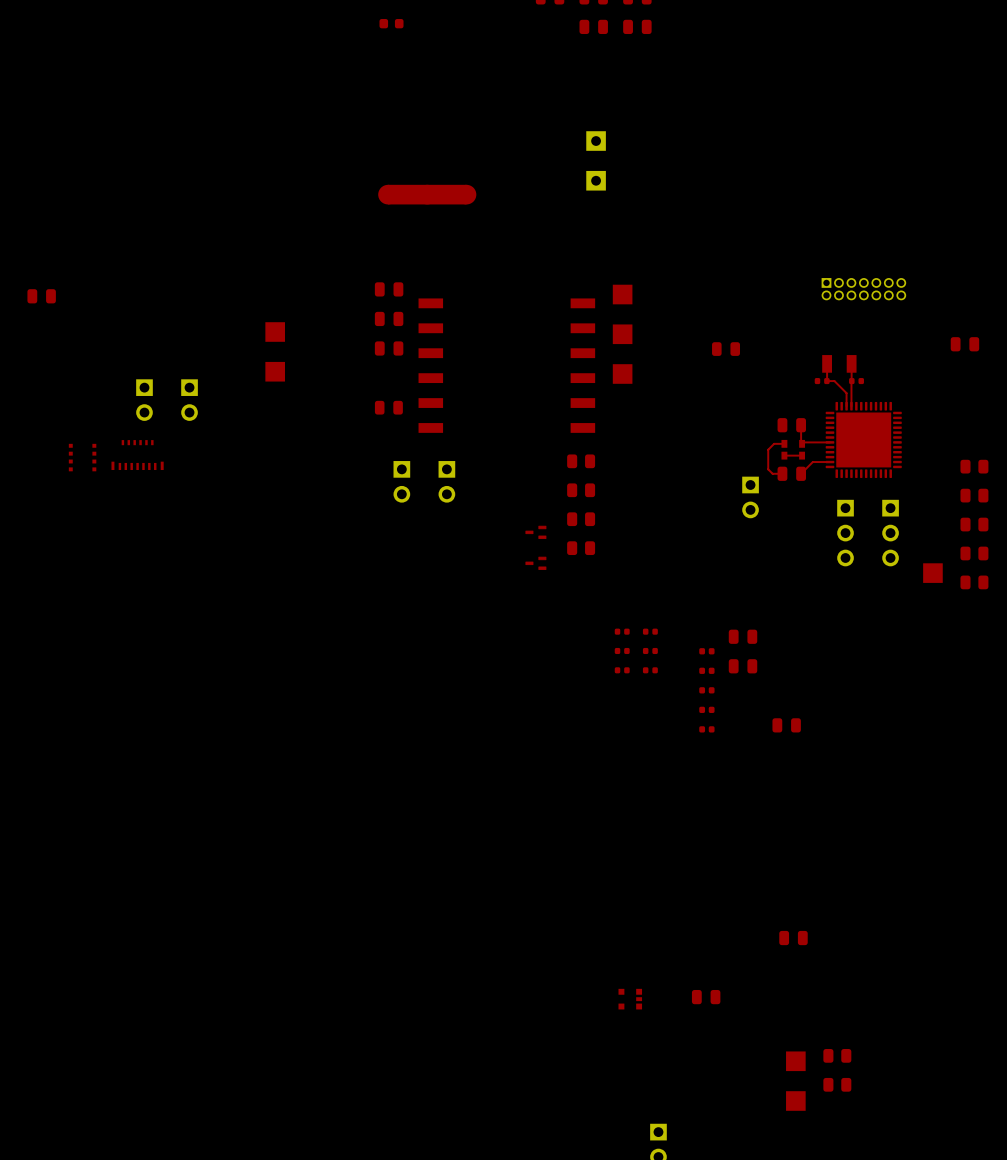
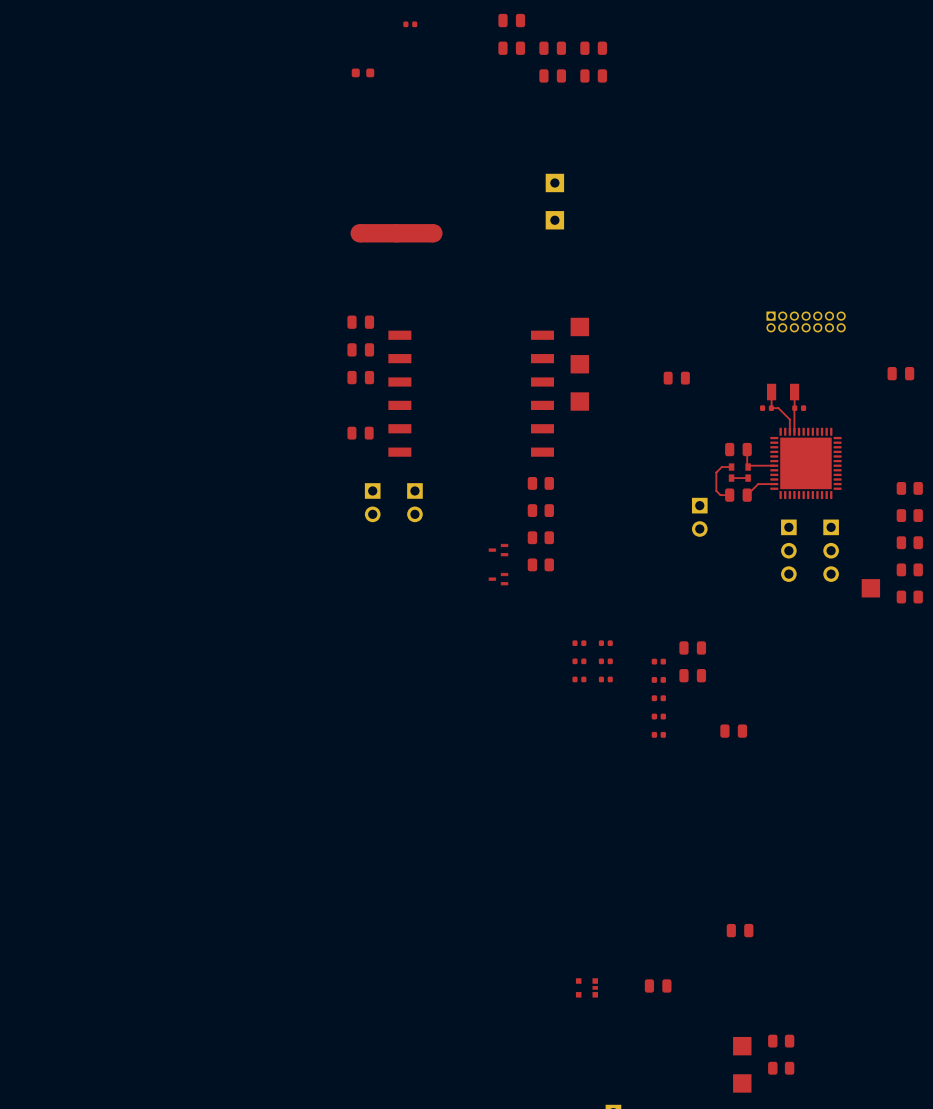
part: (41, 296) -> none
part: (275, 332) -> none
part: (275, 371) -> none
part: (144, 400) -> none
part: (189, 400) -> none
part: (137, 455) -> none
part: (82, 457) -> none

